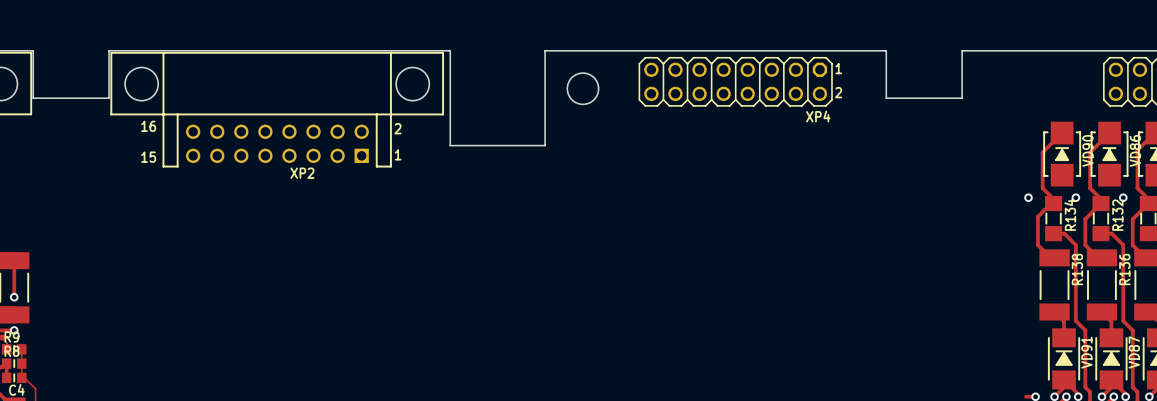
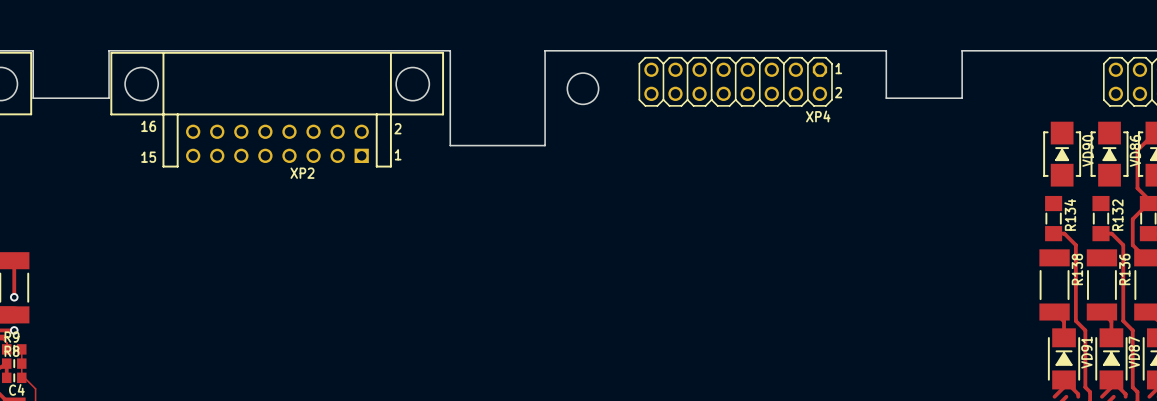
track: (1062, 133) (1042, 152) (1042, 188) (1053, 199) (1053, 203) -> none
track: (1109, 133) (1090, 152) (1090, 188) (1101, 199) (1101, 203) (1085, 219) (1085, 245) (1098, 257) (1101, 257) -> none
via: (1028, 197) -> none
via: (1075, 197) -> none
via: (1123, 197) -> none
track: (1052, 202) (1037, 216) (1037, 245) (1050, 257) (1054, 257) -> none
track: (1026, 396) (1035, 396) -> none
via: (1035, 396) -> none
via: (1054, 396) -> none
via: (1066, 396) -> none
via: (1078, 396) -> none
via: (1101, 396) -> none
via: (1113, 396) -> none
via: (1125, 396) -> none
via: (1149, 396) -> none

